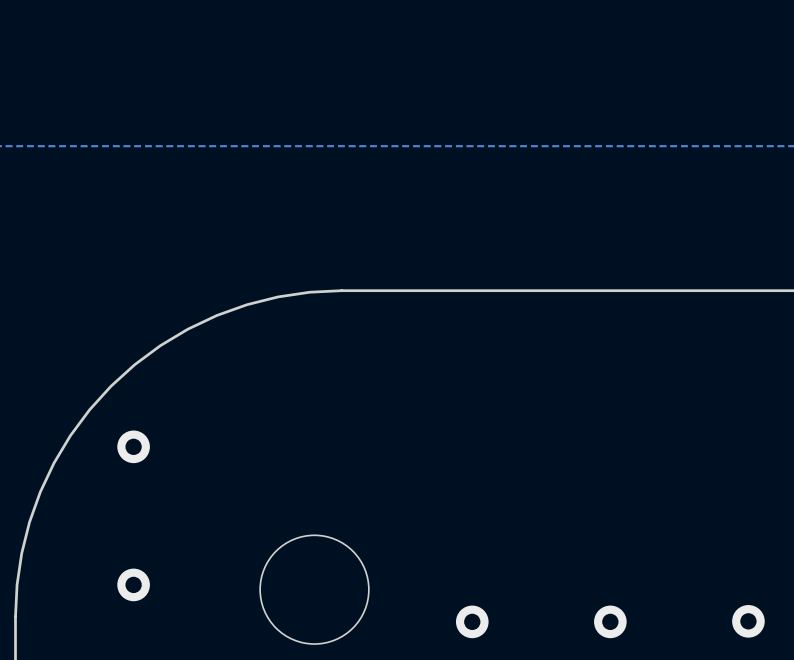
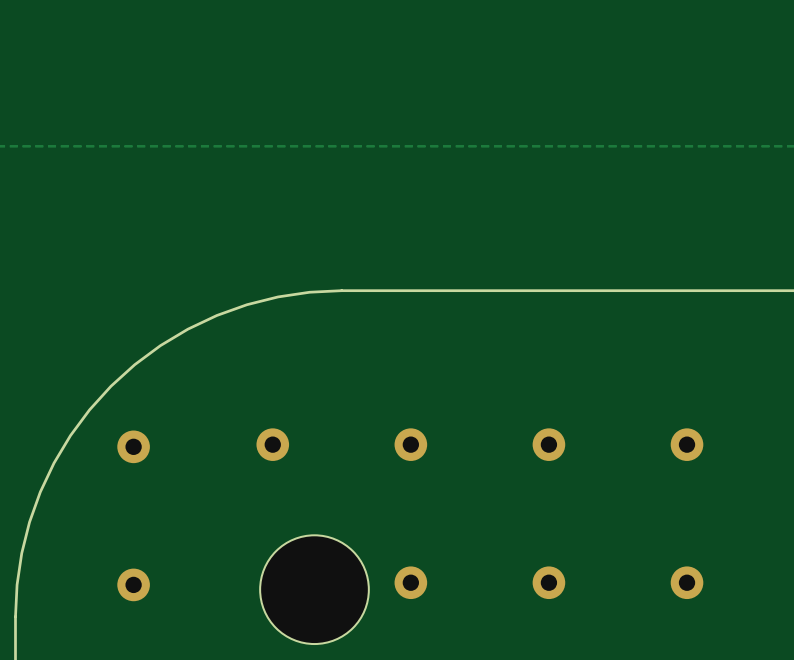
via: none -> (272, 444)
via: none -> (410, 444)
via: none -> (548, 444)
via: none -> (687, 444)
via: none -> (410, 582)
via: none -> (548, 582)
via: none -> (687, 582)
via: (472, 621) -> none
via: (610, 621) -> none
via: (748, 621) -> none

